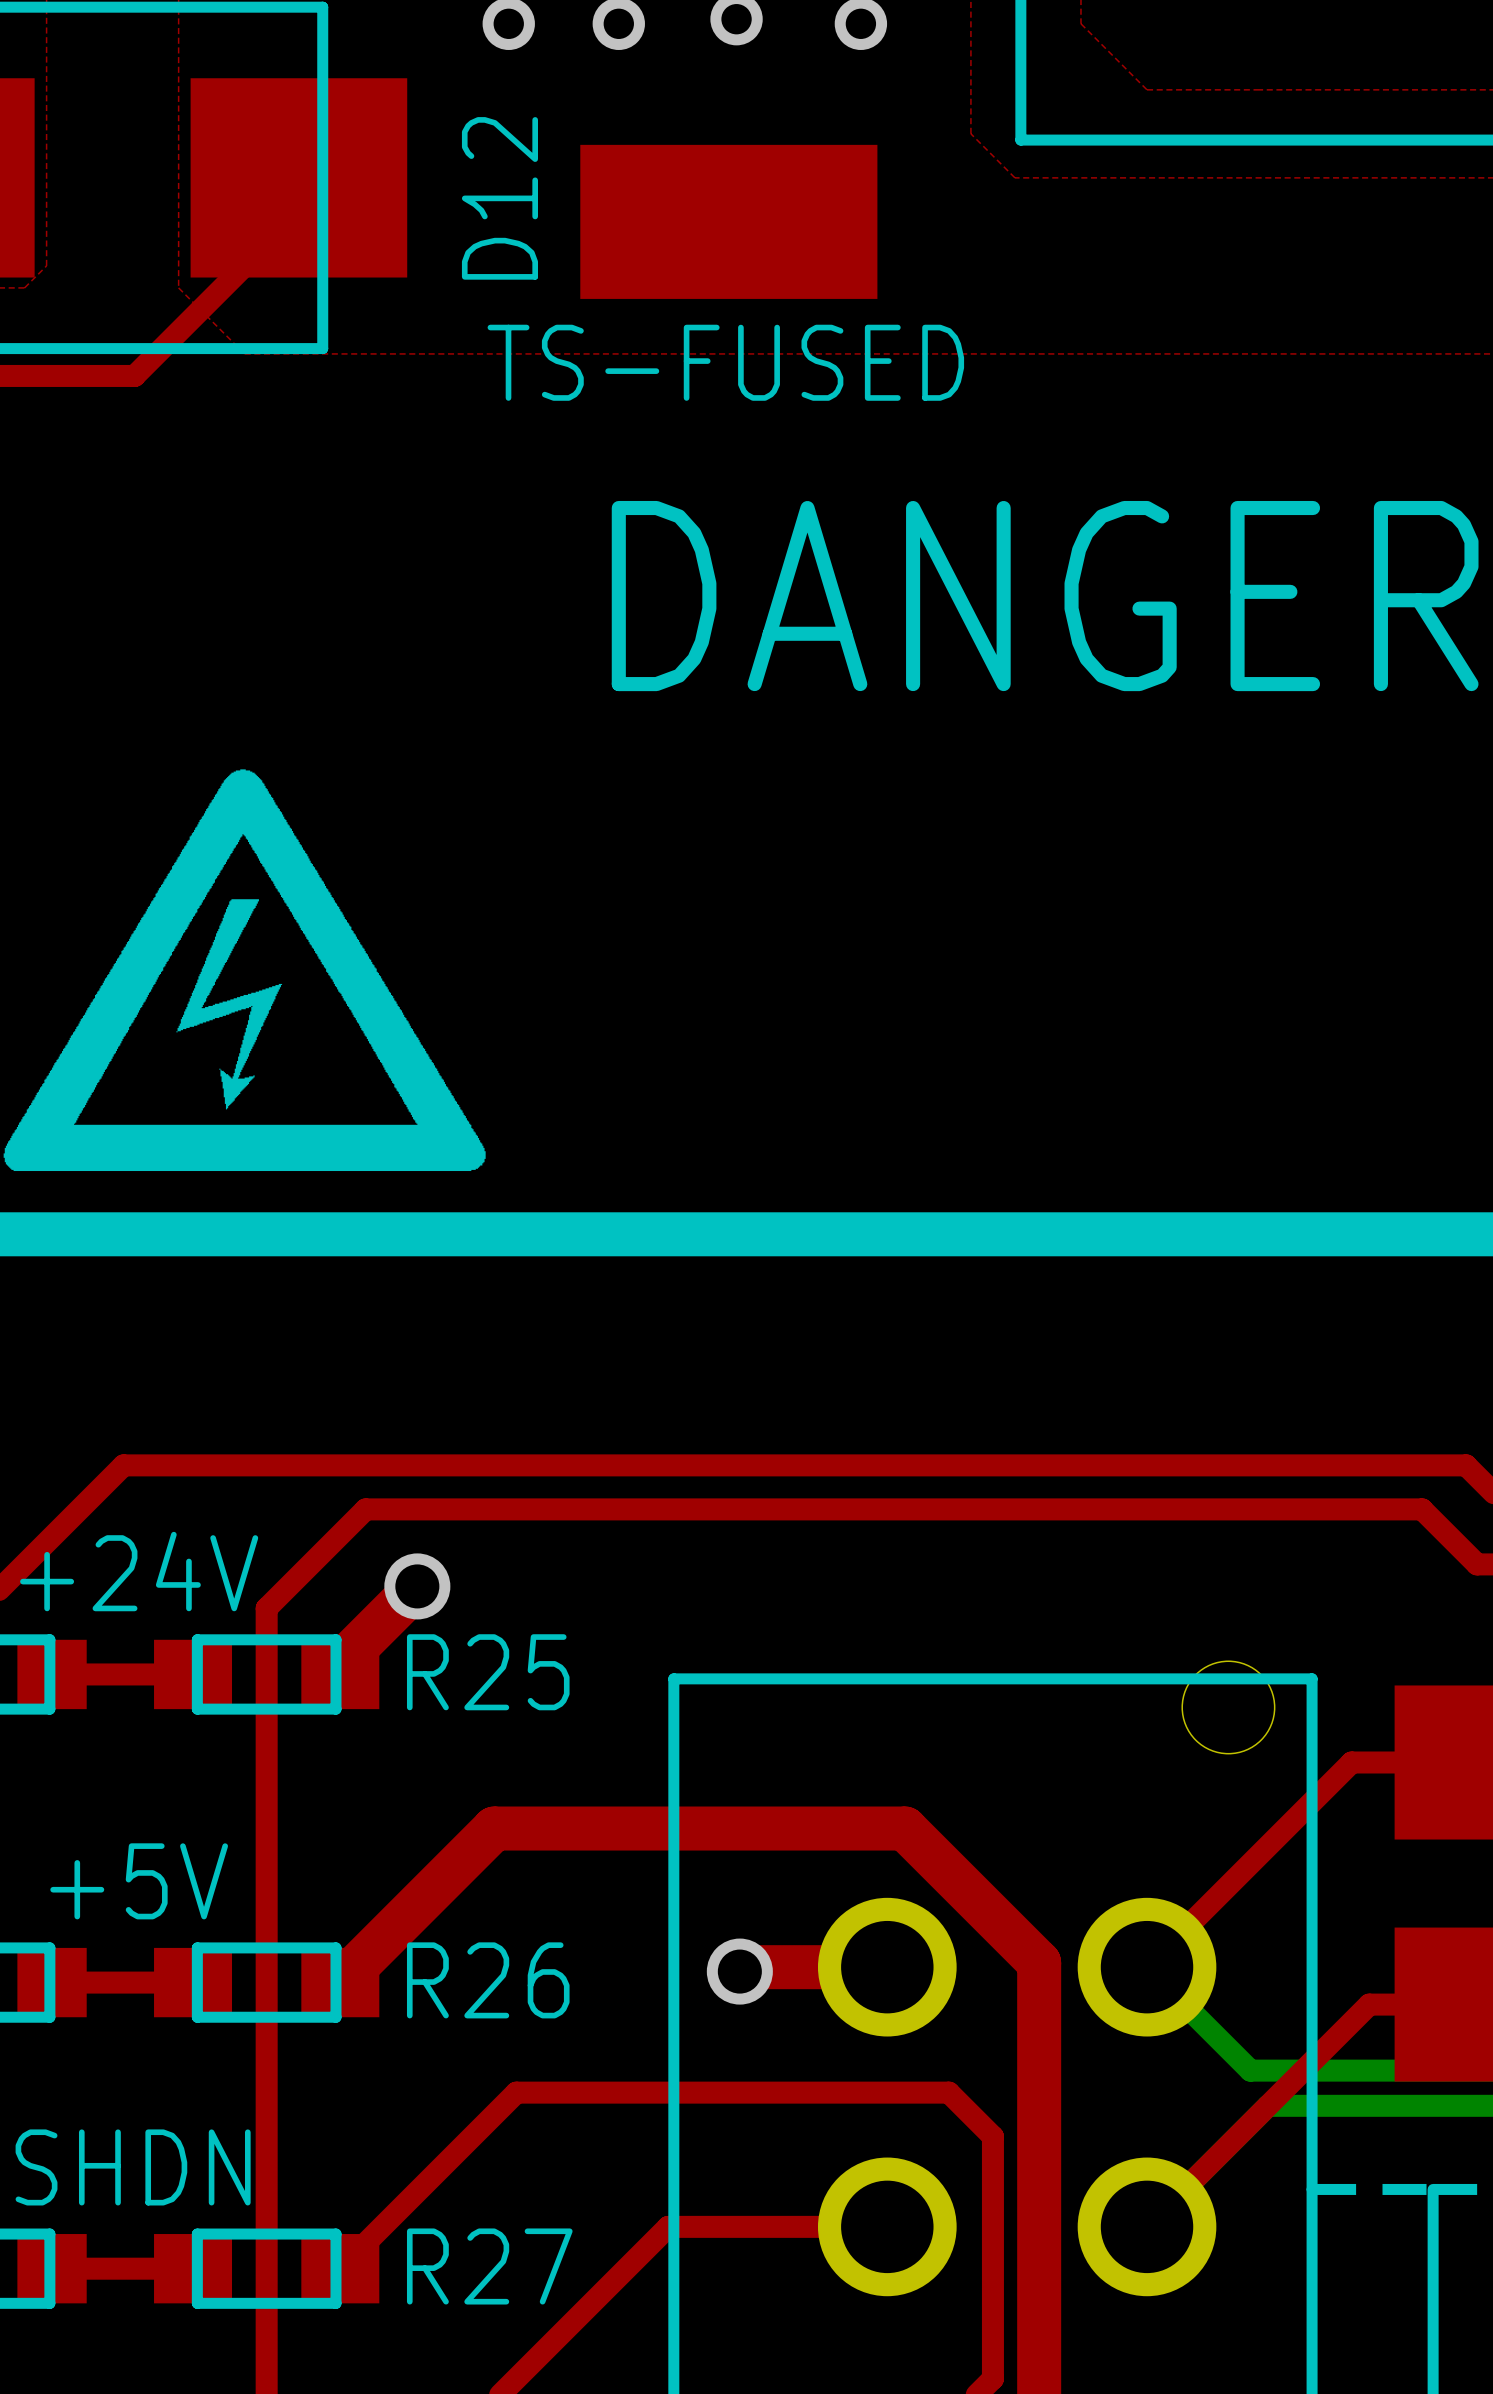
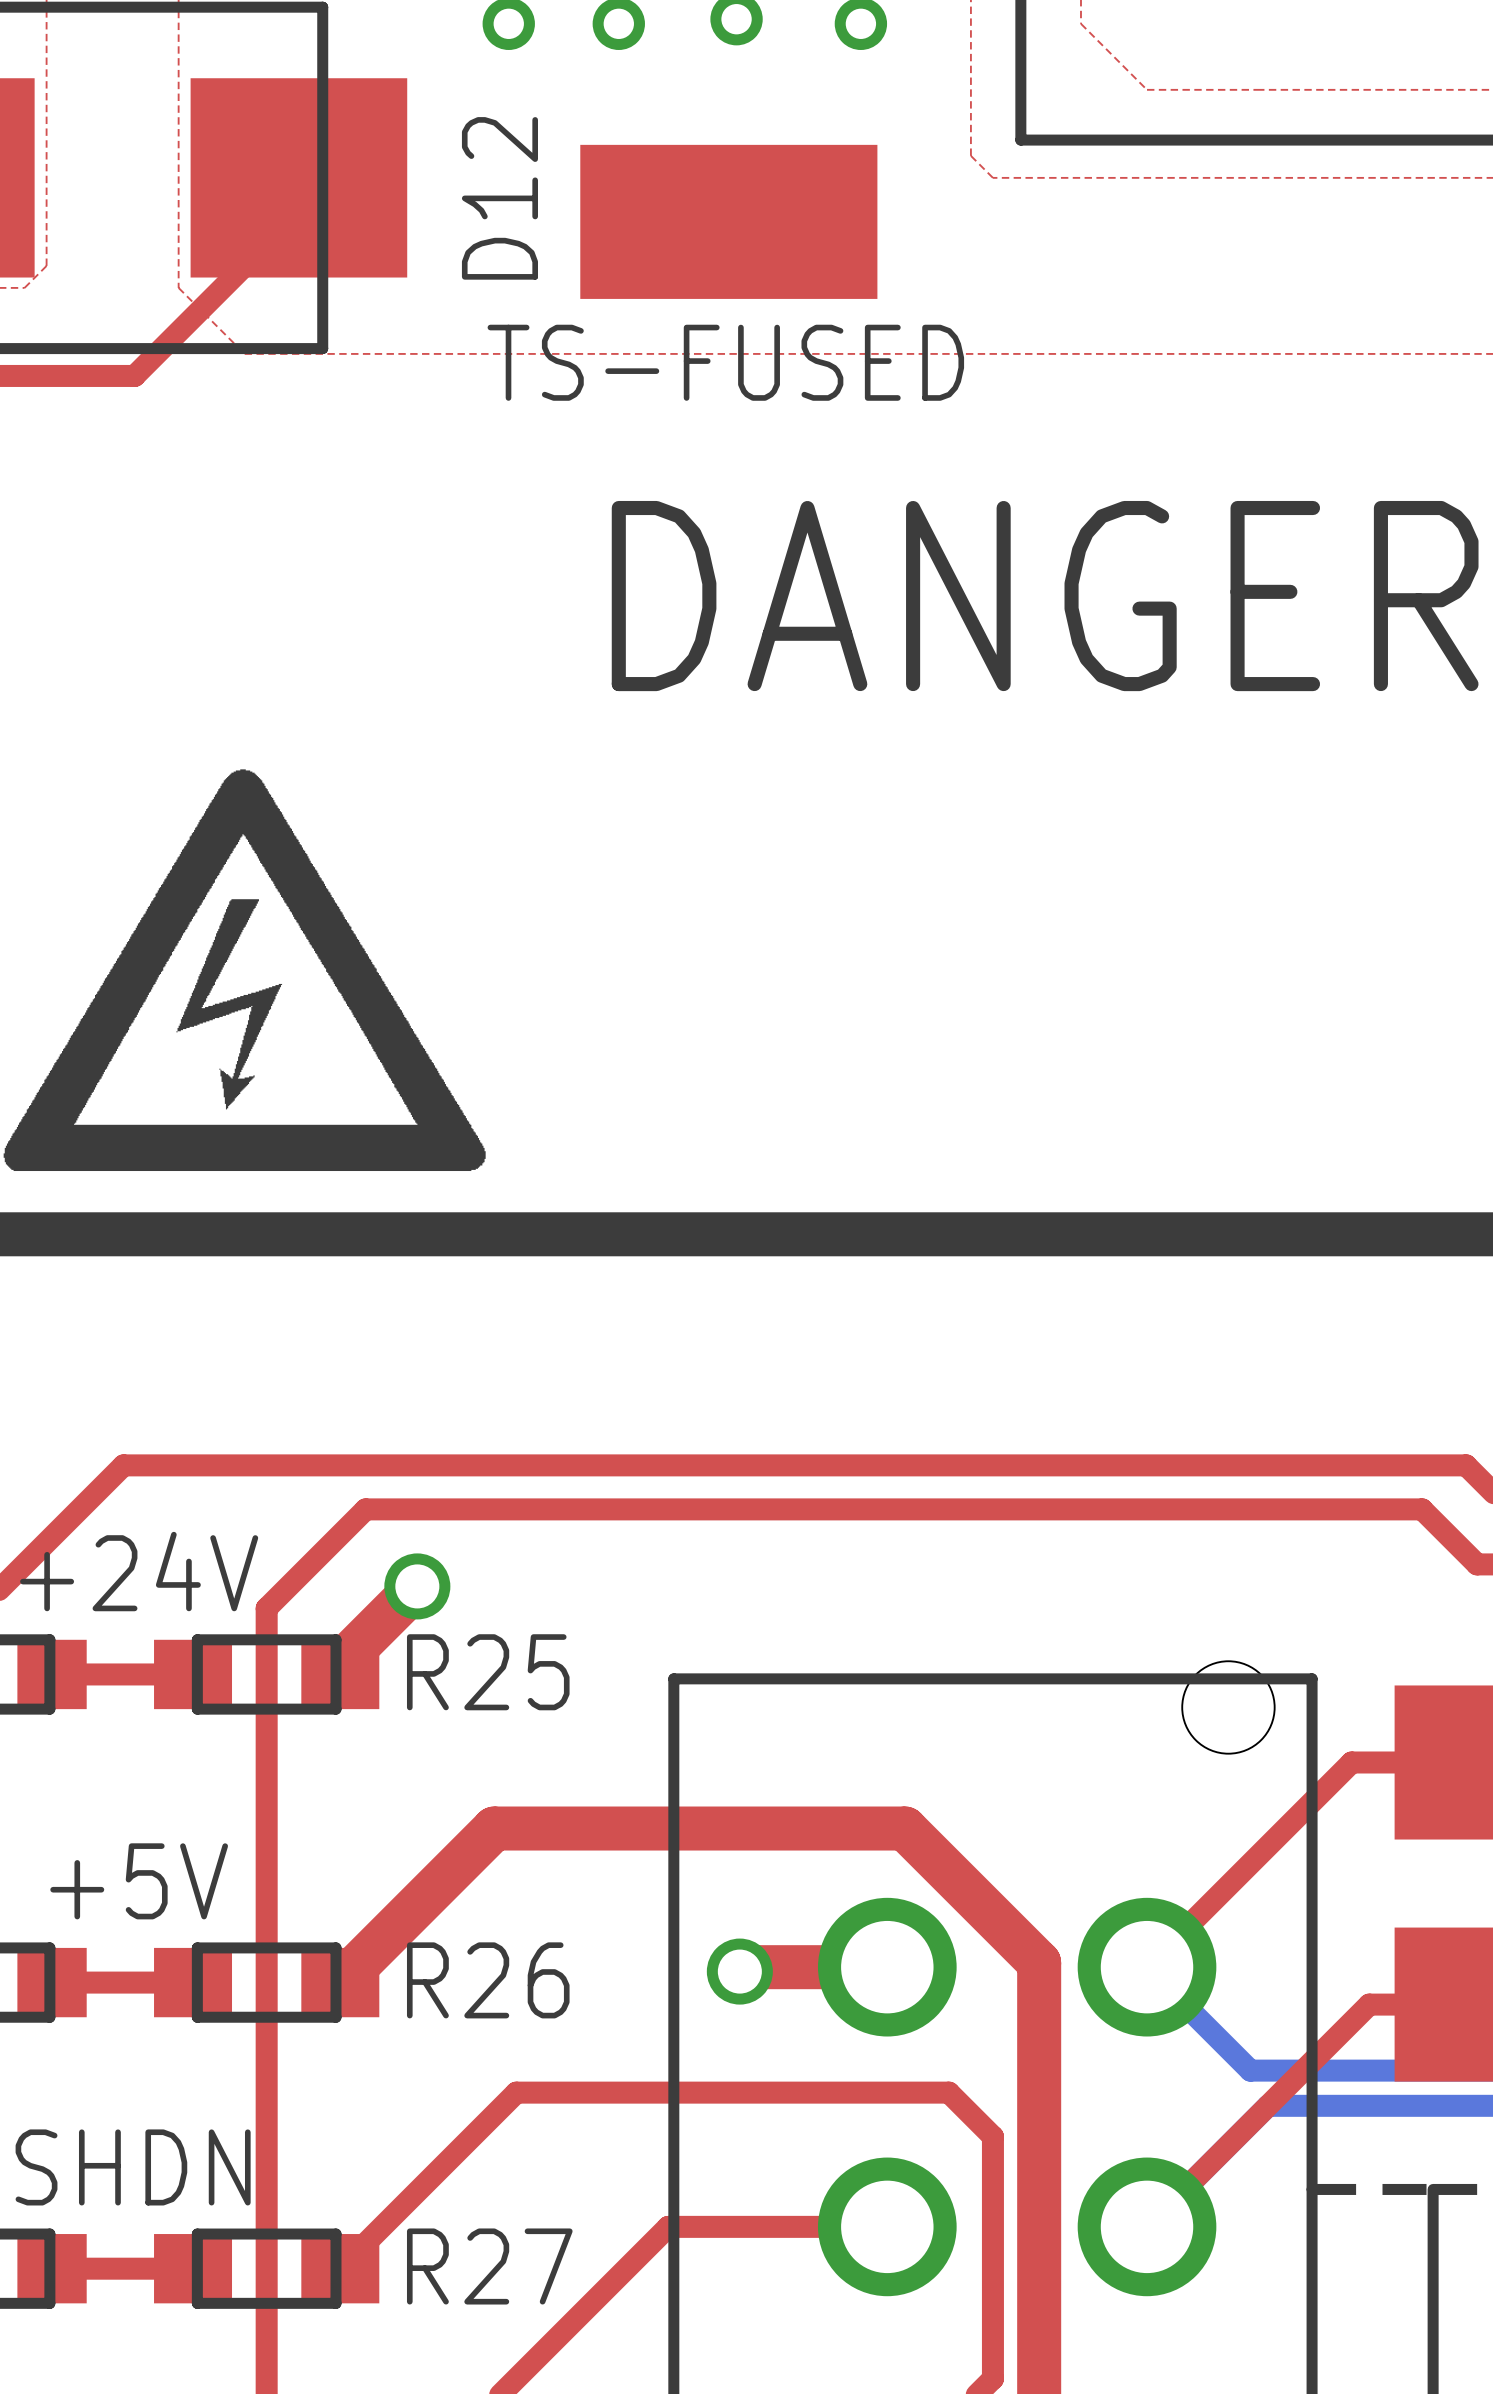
top zone outline: (970, 133) (1014, 177) -> (970, 133) (970, 155) (992, 177) (1014, 177)

